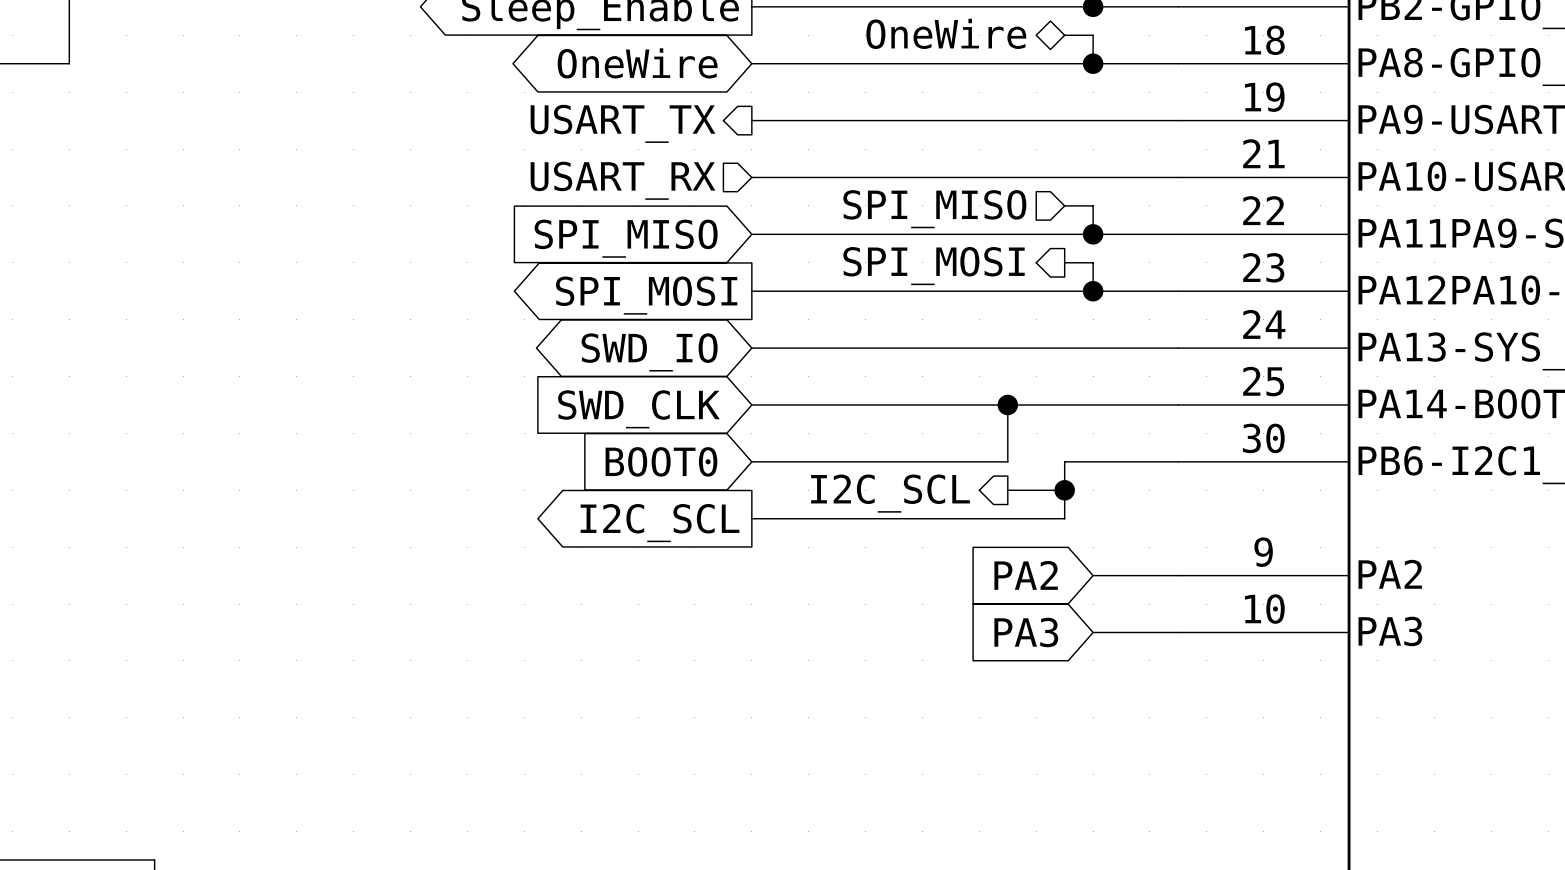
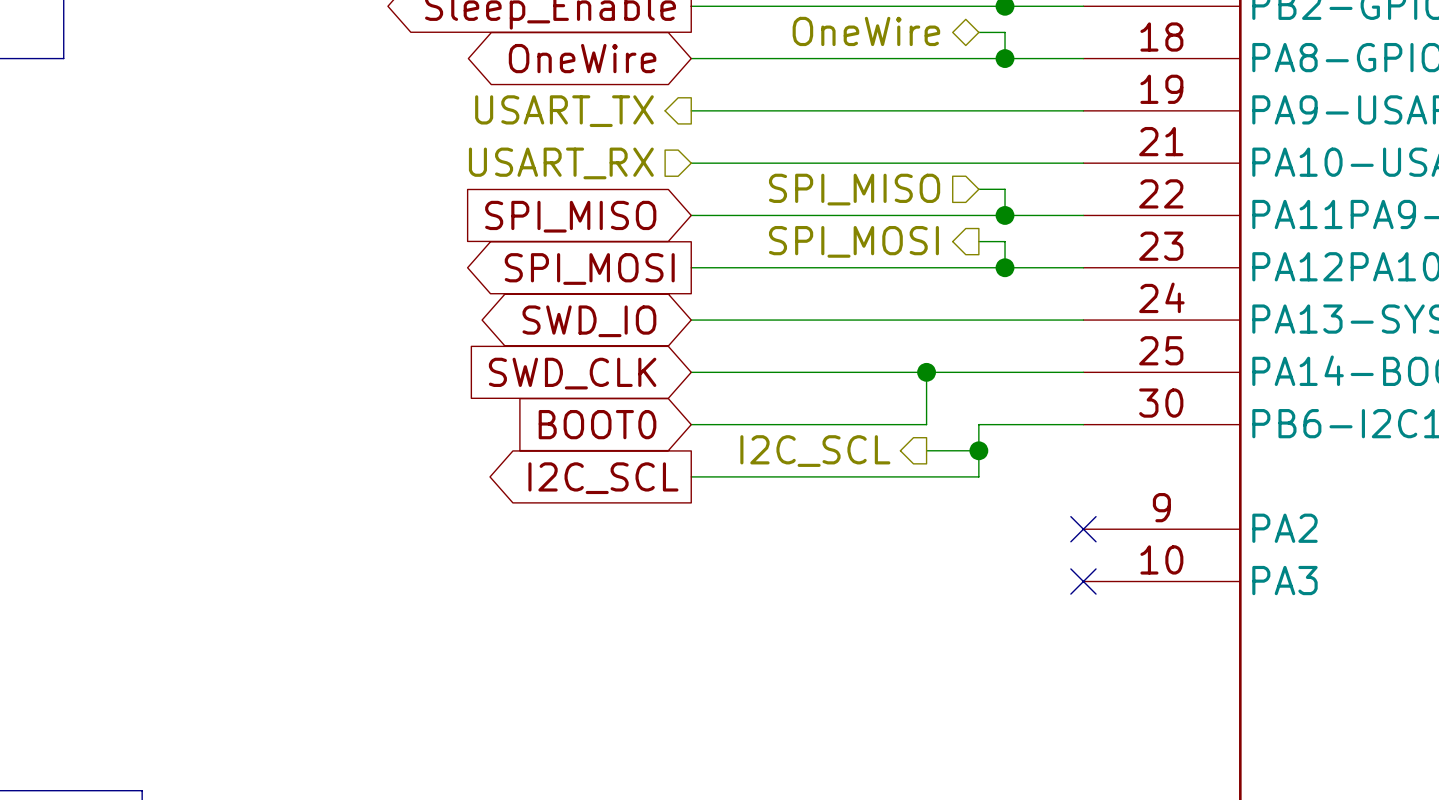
global label: PA2 (1026, 575) -> none
wire: (1093, 575) (1178, 575) -> none
no-connect mark: none -> (1083, 529)
global label: PA3 (1026, 632) -> none
wire: (1093, 632) (1178, 632) -> none
no-connect mark: none -> (1083, 581)

